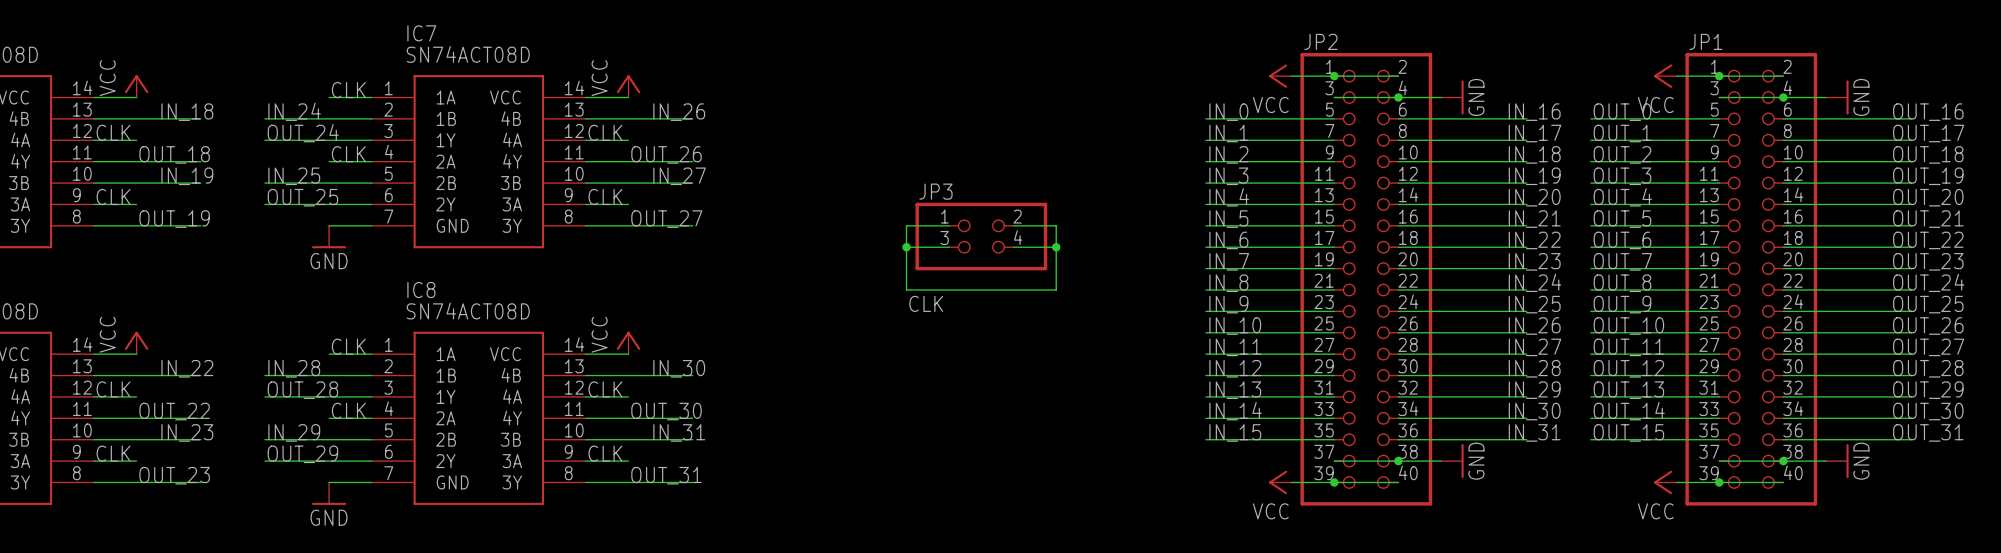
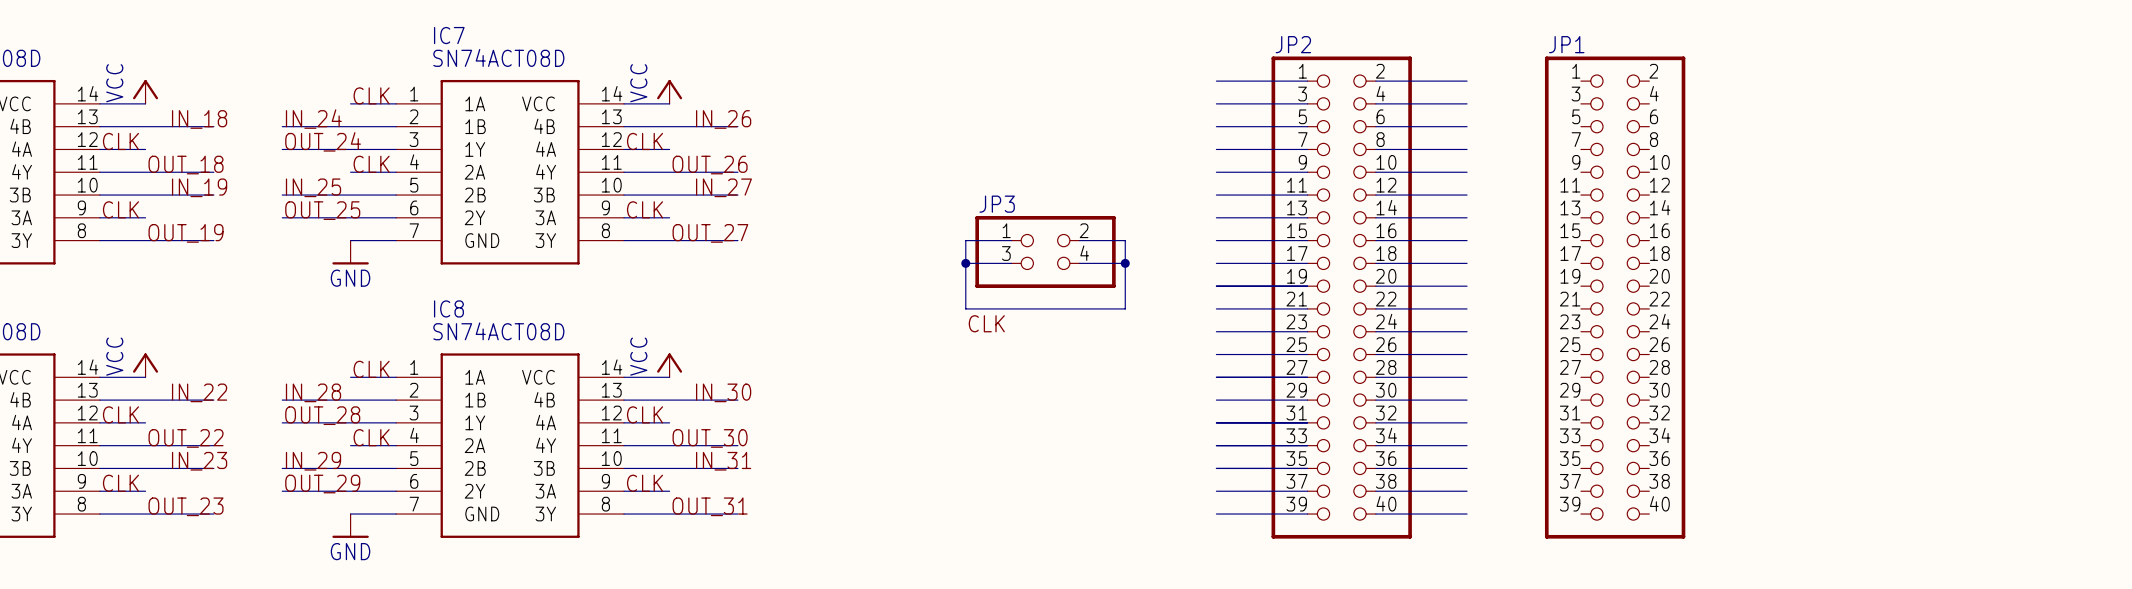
wire: none -> (1216, 81) (1307, 81)
power symbol: VCC (1280, 76) -> none
junction: (1334, 76) -> none
wire: (1377, 76) (1398, 76) -> none
power symbol: VCC (1665, 76) -> none
wire: (1676, 76) (1783, 76) -> none
junction: (1719, 76) -> none
wire: none -> (1216, 103) (1307, 103)
wire: none -> (1375, 103) (1421, 103)
wire: (1377, 97) (1441, 97) -> none
junction: (1398, 97) -> none
power symbol: GND (1452, 97) -> none
wire: (1719, 97) (1826, 97) -> none
junction: (1783, 97) -> none
power symbol: GND (1837, 97) -> none
label: IN_0 (1228, 112) -> none
label: IN_16 (1534, 112) -> none
label: OUT_0 (1622, 112) -> none
label: OUT_16 (1928, 112) -> none
wire: (1227, 118) (1291, 118) -> (1216, 126) (1284, 126)
wire: none -> (1421, 126) (1467, 126)
wire: (1398, 118) (1526, 118) -> none
wire: (1590, 118) (1719, 118) -> none
wire: (1783, 118) (1911, 118) -> none
label: IN_1 (1228, 133) -> none
label: IN_17 (1535, 133) -> none
label: OUT_1 (1622, 133) -> none
label: OUT_17 (1928, 133) -> none
wire: (1227, 140) (1291, 140) -> (1216, 149) (1284, 149)
wire: none -> (1421, 149) (1467, 149)
wire: (1398, 140) (1526, 140) -> none
wire: (1590, 140) (1719, 140) -> none
wire: (1783, 140) (1911, 140) -> none
label: IN_2 (1228, 154) -> none
label: IN_18 (1534, 154) -> none
label: OUT_2 (1622, 154) -> none
label: OUT_18 (1928, 154) -> none
wire: (1227, 161) (1291, 161) -> (1216, 172) (1284, 172)
wire: none -> (1421, 172) (1467, 172)
wire: (1398, 161) (1526, 161) -> none
wire: (1590, 161) (1719, 161) -> none
wire: (1783, 161) (1911, 161) -> none
label: IN_3 (1228, 176) -> none
label: IN_19 (1534, 176) -> none
label: OUT_3 (1622, 176) -> none
label: OUT_19 (1928, 176) -> none
wire: (1227, 183) (1291, 183) -> (1216, 195) (1284, 195)
wire: none -> (1421, 195) (1467, 195)
wire: (1398, 183) (1526, 183) -> none
wire: (1590, 183) (1719, 183) -> none
wire: (1783, 183) (1911, 183) -> none
label: IN_4 (1229, 197) -> none
label: IN_20 (1534, 197) -> none
label: OUT_4 (1622, 197) -> none
label: OUT_20 (1928, 197) -> none
wire: (1227, 204) (1291, 204) -> (1216, 217) (1284, 217)
wire: none -> (1421, 217) (1467, 217)
wire: (1398, 204) (1526, 204) -> none
wire: (1590, 204) (1719, 204) -> none
wire: (1783, 204) (1911, 204) -> none
label: IN_5 (1228, 219) -> none
label: IN_21 (1534, 219) -> none
label: OUT_5 (1622, 219) -> none
label: OUT_21 (1928, 219) -> none
wire: (1227, 225) (1291, 225) -> (1216, 240) (1284, 240)
wire: none -> (1421, 240) (1467, 240)
wire: (1398, 225) (1526, 225) -> none
wire: (1590, 225) (1719, 225) -> none
wire: (1783, 225) (1911, 225) -> none
label: IN_6 (1228, 240) -> none
label: IN_22 (1534, 240) -> none
label: OUT_6 (1622, 240) -> none
label: OUT_22 (1928, 240) -> none
wire: (1227, 247) (1291, 247) -> (1216, 263) (1284, 263)
wire: none -> (1421, 263) (1467, 263)
wire: (1398, 247) (1526, 247) -> none
wire: (1590, 247) (1719, 247) -> none
wire: (1783, 247) (1911, 247) -> none
label: IN_7 (1229, 261) -> none
label: IN_23 (1534, 261) -> none
label: OUT_7 (1622, 261) -> none
label: OUT_23 (1928, 261) -> none
wire: (1227, 268) (1291, 268) -> (1216, 286) (1284, 286)
wire: none -> (1421, 286) (1467, 286)
wire: (1398, 268) (1526, 268) -> none
wire: (1590, 268) (1719, 268) -> none
wire: (1783, 268) (1911, 268) -> none
JP2 position: (1366, 279) -> (1341, 297)
JP1 position: (1751, 279) -> (1615, 297)
label: IN_24 (1535, 282) -> none
label: OUT_24 (1928, 282) -> none
label: IN_8 (1228, 283) -> none
label: OUT_8 (1622, 283) -> none
wire: (1227, 289) (1291, 289) -> (1216, 308) (1284, 308)
wire: none -> (1421, 308) (1467, 308)
wire: (1398, 289) (1526, 289) -> none
wire: (1590, 289) (1719, 289) -> none
wire: (1783, 289) (1911, 289) -> none
label: IN_9 (1228, 304) -> none
label: IN_25 (1534, 304) -> none
label: OUT_9 (1622, 304) -> none
label: OUT_25 (1928, 304) -> none
wire: (1227, 311) (1291, 311) -> (1216, 331) (1284, 331)
wire: none -> (1421, 331) (1467, 331)
wire: (1398, 311) (1526, 311) -> none
wire: (1590, 311) (1719, 311) -> none
wire: (1783, 311) (1911, 311) -> none
label: IN_10 (1235, 325) -> none
label: IN_26 (1534, 325) -> none
label: OUT_10 (1628, 325) -> none
label: OUT_26 (1928, 325) -> none
wire: (1227, 332) (1291, 332) -> (1216, 354) (1284, 354)
wire: none -> (1421, 354) (1467, 354)
wire: (1398, 332) (1526, 332) -> none
wire: (1590, 332) (1719, 332) -> none
wire: (1783, 332) (1911, 332) -> none
label: IN_11 (1235, 347) -> none
label: IN_27 (1535, 347) -> none
label: OUT_11 (1628, 347) -> none
label: OUT_27 (1928, 347) -> none
wire: (1227, 354) (1291, 354) -> (1216, 377) (1284, 377)
wire: none -> (1421, 377) (1467, 377)
wire: (1398, 354) (1526, 354) -> none
wire: (1590, 354) (1719, 354) -> none
wire: (1783, 354) (1911, 354) -> none
label: IN_12 (1235, 368) -> none
label: IN_28 (1534, 368) -> none
label: OUT_12 (1628, 368) -> none
label: OUT_28 (1928, 368) -> none
wire: (1227, 375) (1291, 375) -> (1216, 400) (1284, 400)
wire: none -> (1421, 400) (1467, 400)
wire: (1398, 375) (1526, 375) -> none
wire: (1590, 375) (1719, 375) -> none
wire: (1783, 375) (1911, 375) -> none
label: IN_13 (1235, 390) -> none
label: IN_29 (1534, 390) -> none
label: OUT_13 (1628, 390) -> none
label: OUT_29 (1928, 390) -> none
wire: (1227, 396) (1291, 396) -> (1216, 422) (1284, 422)
wire: none -> (1421, 422) (1467, 422)
wire: (1398, 396) (1526, 396) -> none
wire: (1590, 396) (1719, 396) -> none
wire: (1783, 396) (1911, 396) -> none
label: IN_14 (1235, 411) -> none
label: IN_30 (1534, 411) -> none
label: OUT_14 (1629, 411) -> none
label: OUT_30 (1928, 411) -> none
wire: (1227, 418) (1291, 418) -> (1216, 445) (1284, 445)
wire: none -> (1421, 445) (1467, 445)
wire: (1398, 418) (1526, 418) -> none
wire: (1590, 418) (1719, 418) -> none
wire: (1783, 418) (1911, 418) -> none
label: IN_15 (1235, 432) -> none
label: IN_31 (1534, 432) -> none
label: OUT_15 (1628, 432) -> none
label: OUT_31 (1928, 432) -> none
wire: (1227, 439) (1291, 439) -> (1216, 468) (1284, 468)
wire: none -> (1421, 468) (1467, 468)
wire: (1398, 439) (1526, 439) -> none
wire: (1590, 439) (1719, 439) -> none
wire: (1783, 439) (1911, 439) -> none
wire: none -> (1216, 491) (1307, 491)
wire: none -> (1375, 491) (1421, 491)
wire: (1377, 461) (1441, 461) -> none
junction: (1398, 461) -> none
power symbol: GND (1452, 461) -> none
wire: (1719, 461) (1826, 461) -> none
junction: (1783, 461) -> none
power symbol: GND (1837, 461) -> none
wire: none -> (1216, 514) (1307, 514)
power symbol: VCC (1280, 482) -> none
junction: (1334, 482) -> none
wire: (1377, 482) (1398, 482) -> none
power symbol: VCC (1665, 482) -> none
wire: (1676, 482) (1783, 482) -> none
junction: (1719, 482) -> none

